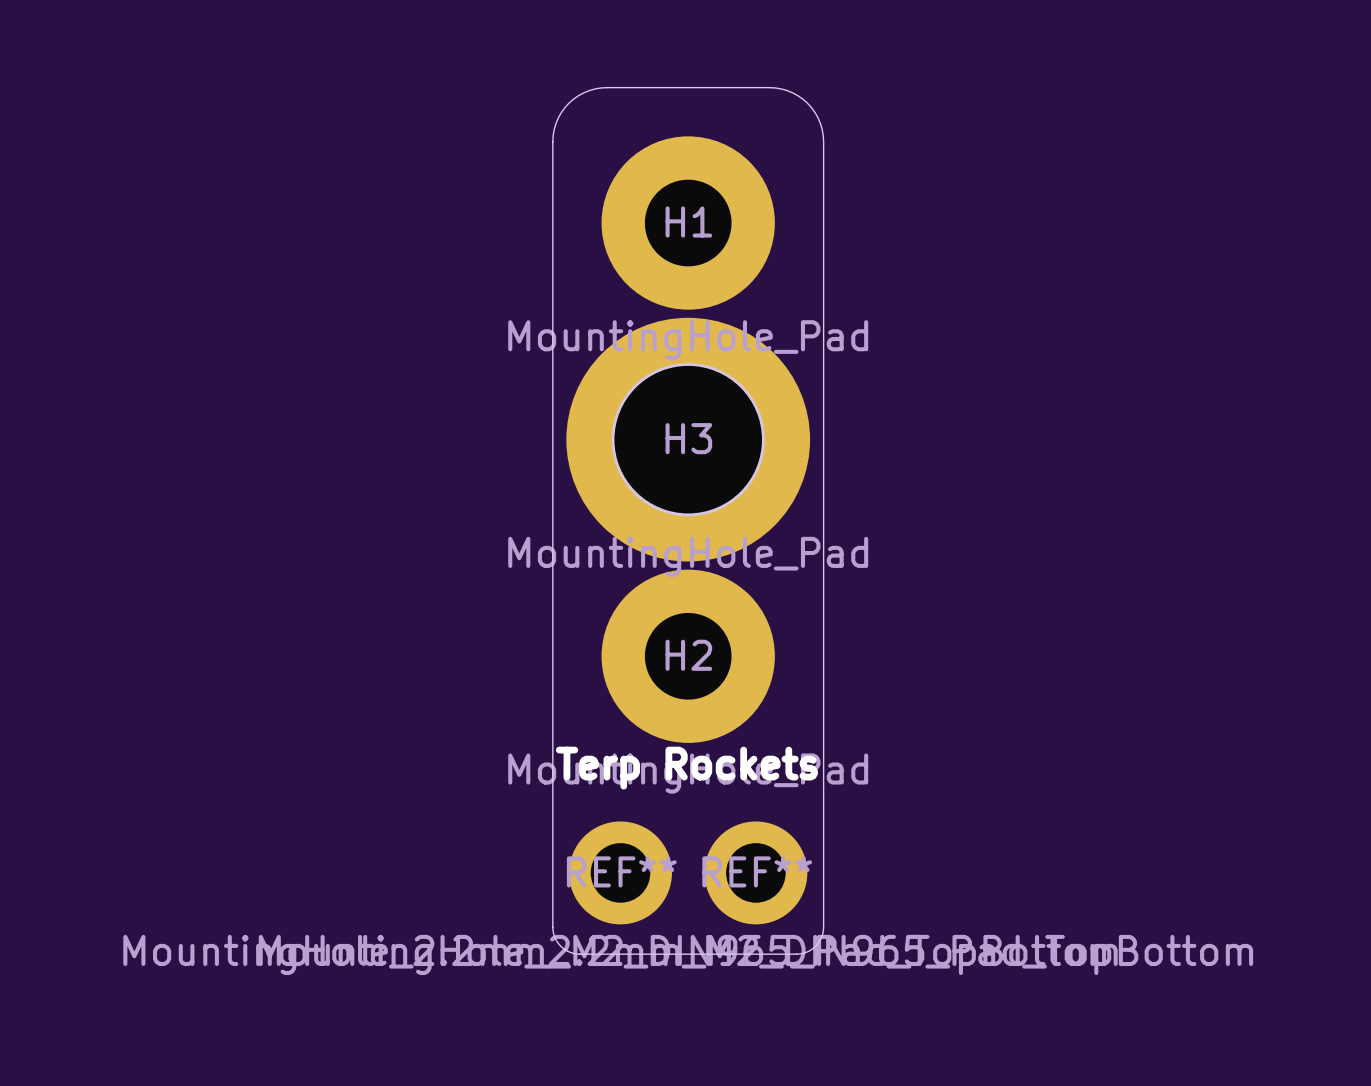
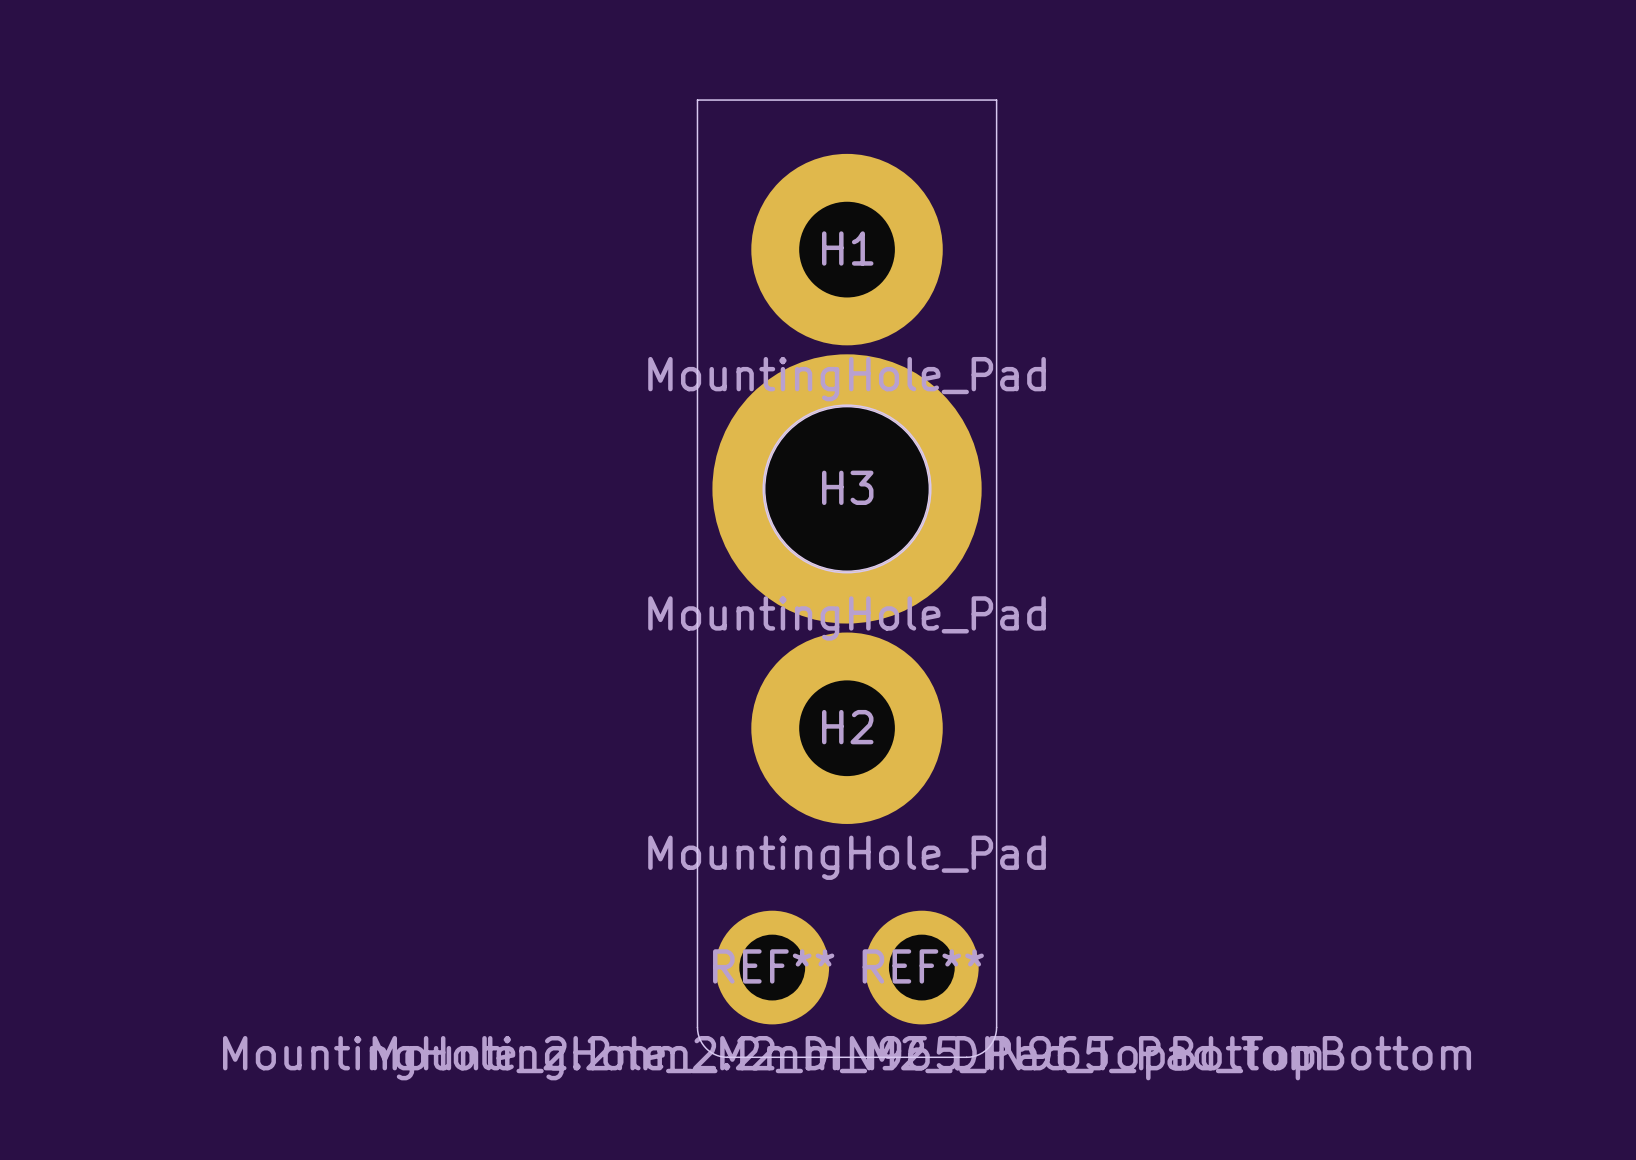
board edge: (606, 87) (589, 90) (568, 103) (555, 123) (552, 141) -> (757, 100) (697, 100) (697, 159)
board edge: (769, 87) (792, 92) (807, 103) (820, 123) (823, 141) -> (936, 100) (996, 100) (996, 159)
text: Terp Rockets (686, 768) -> none

